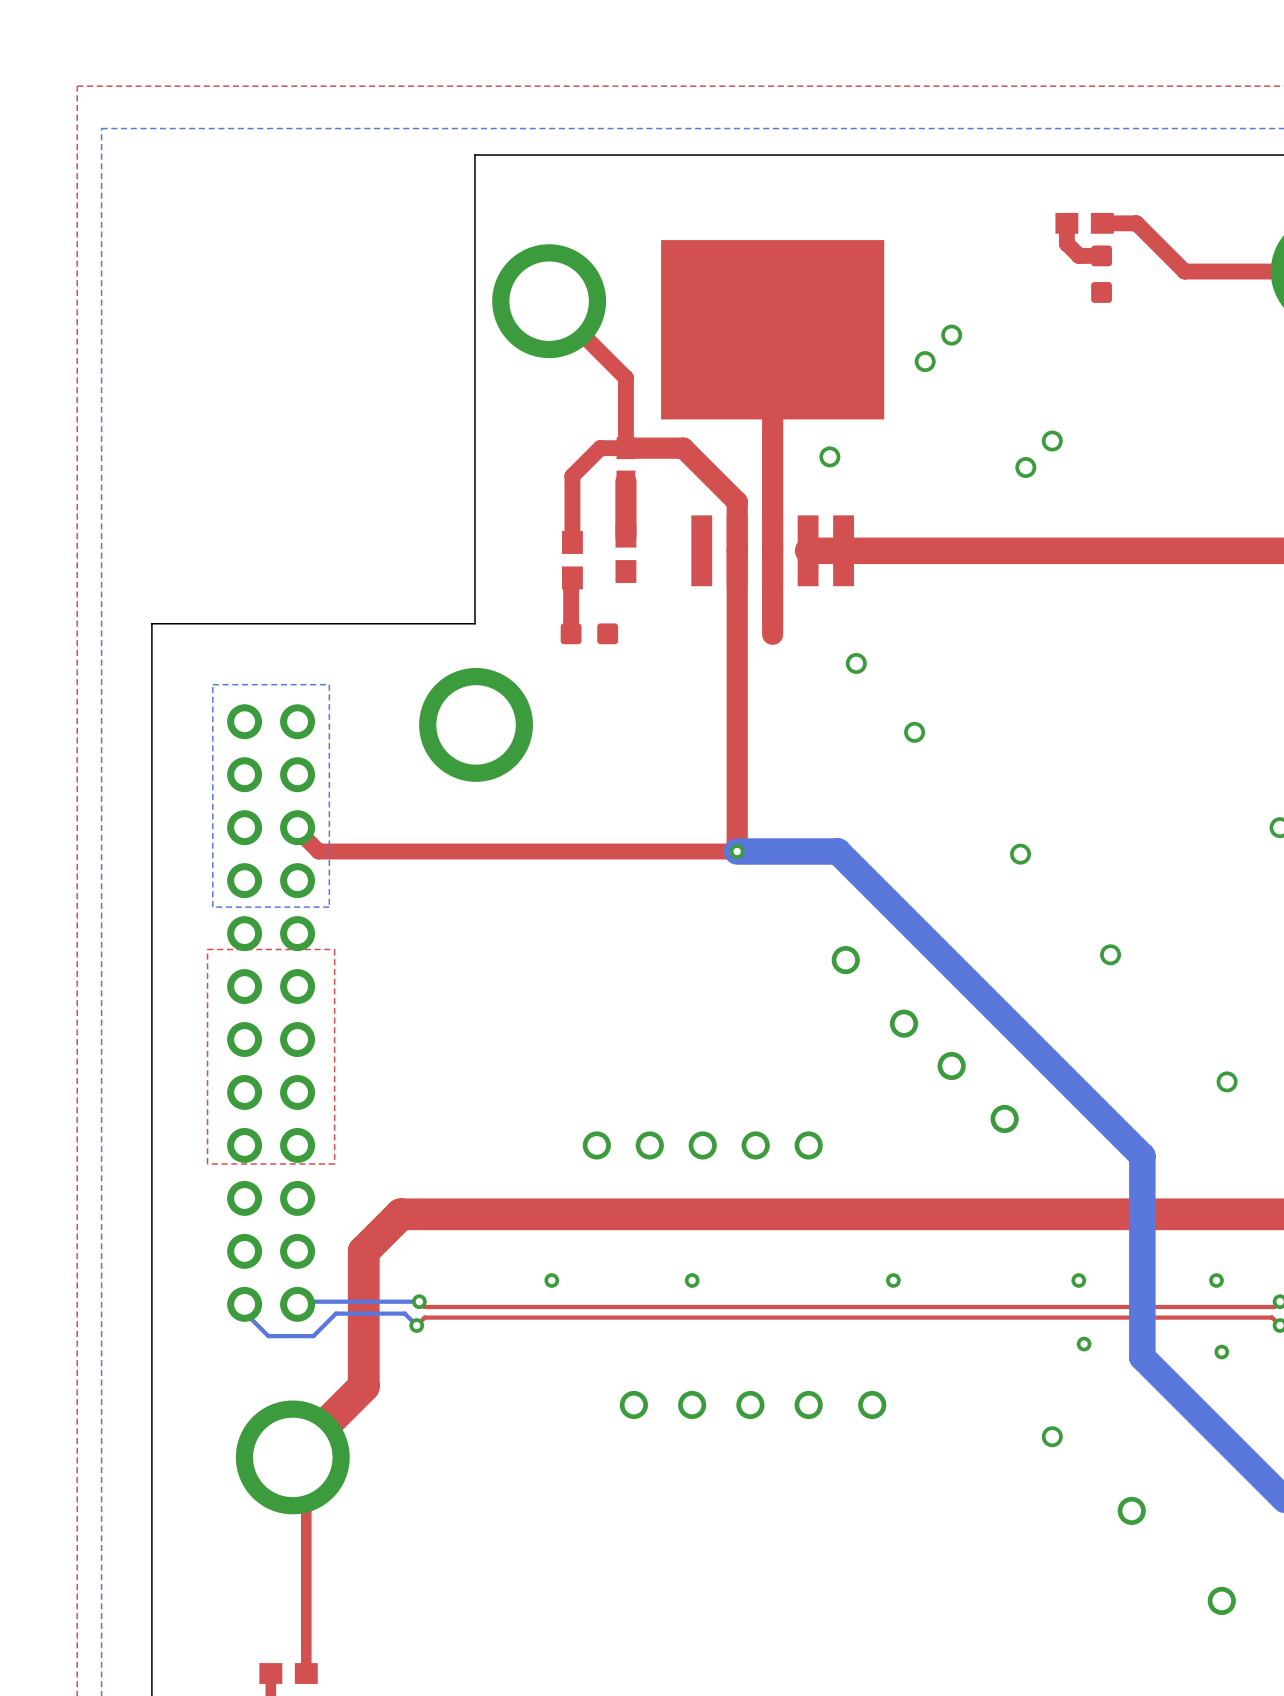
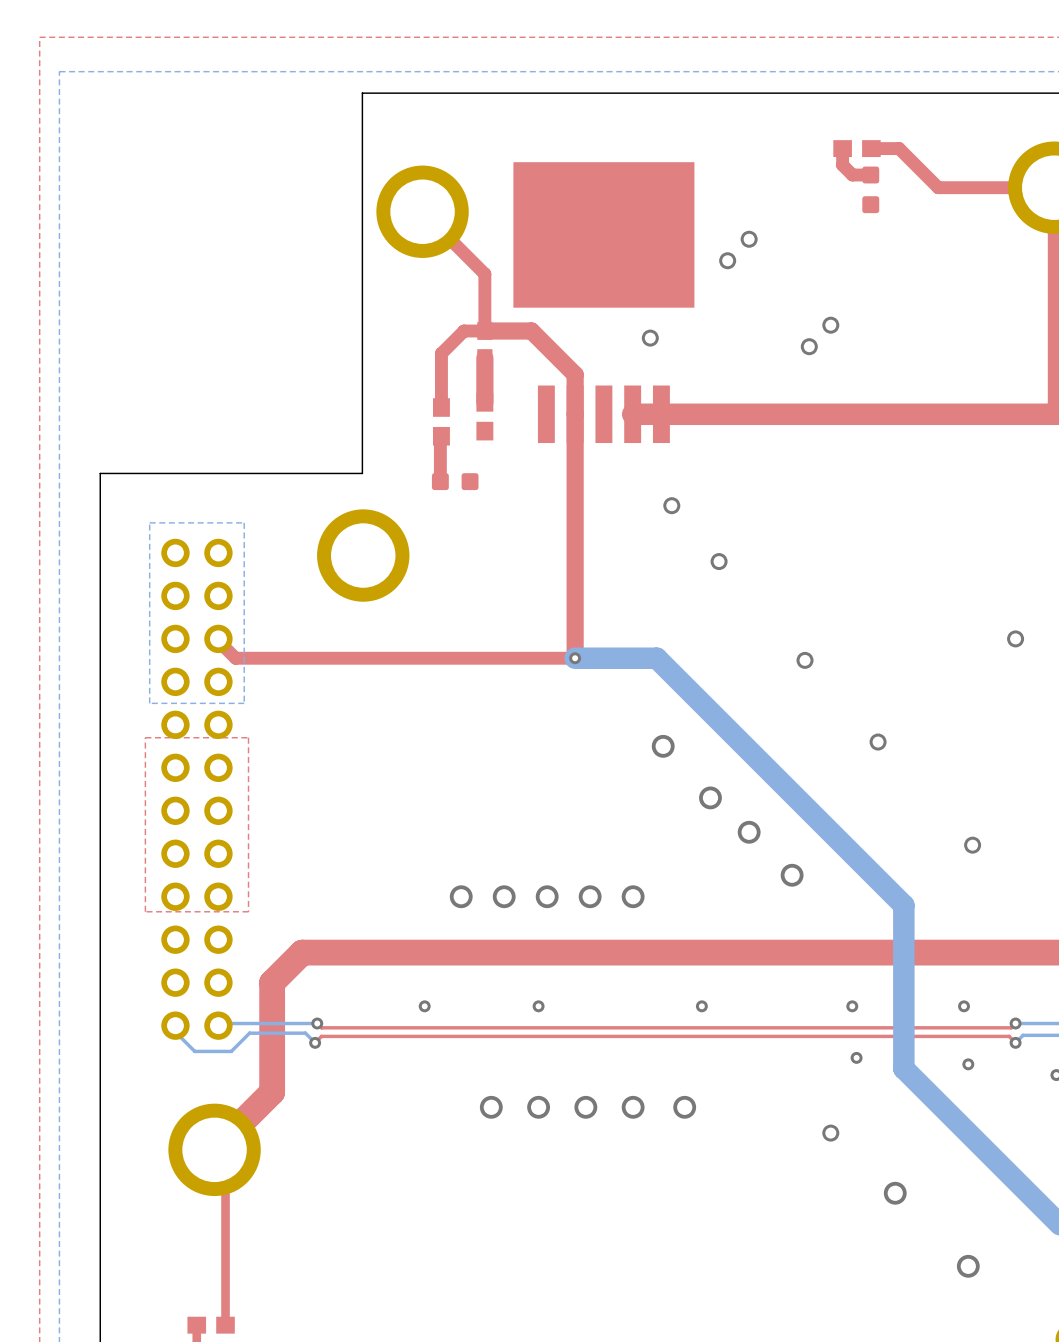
top track: (772, 329) (772, 634) -> none

